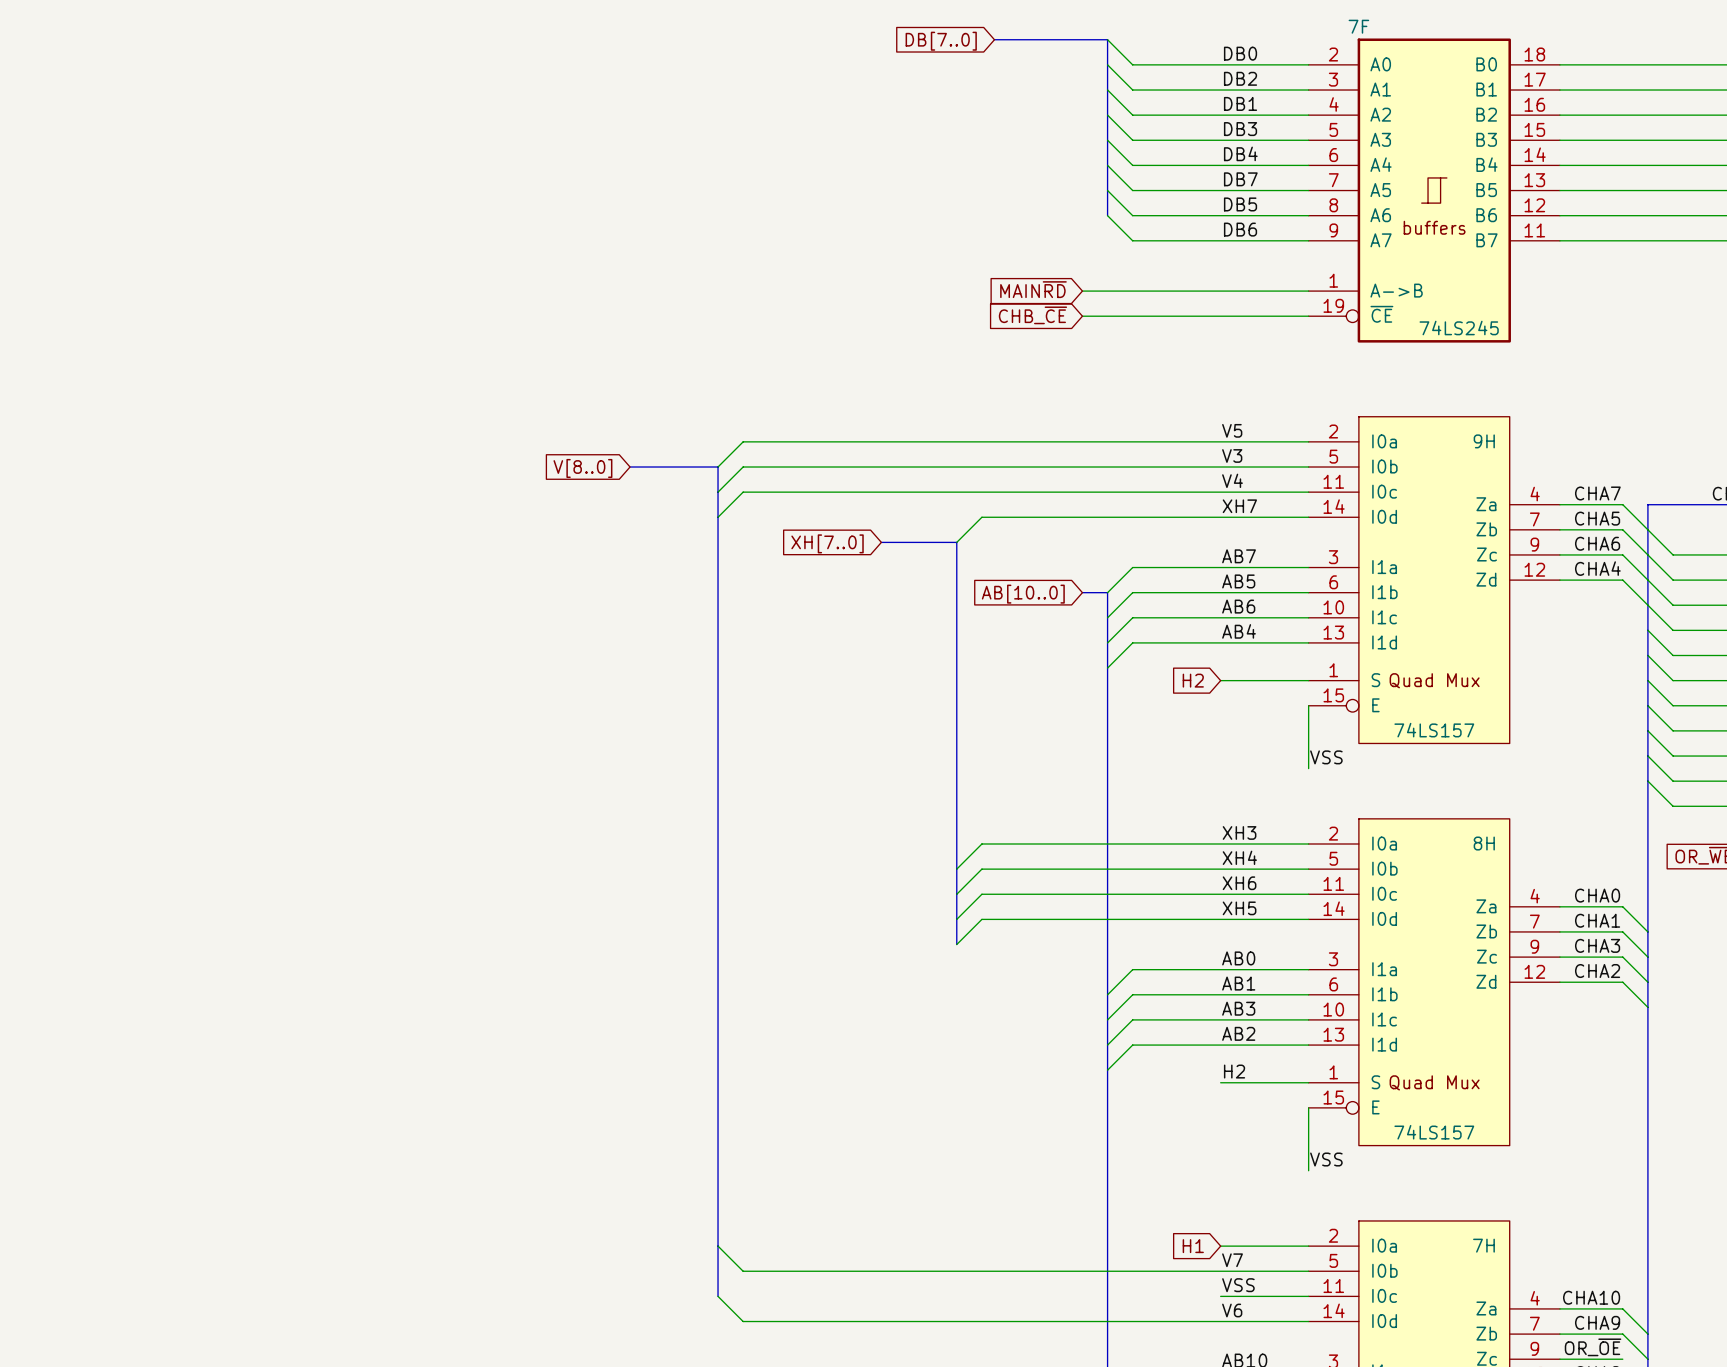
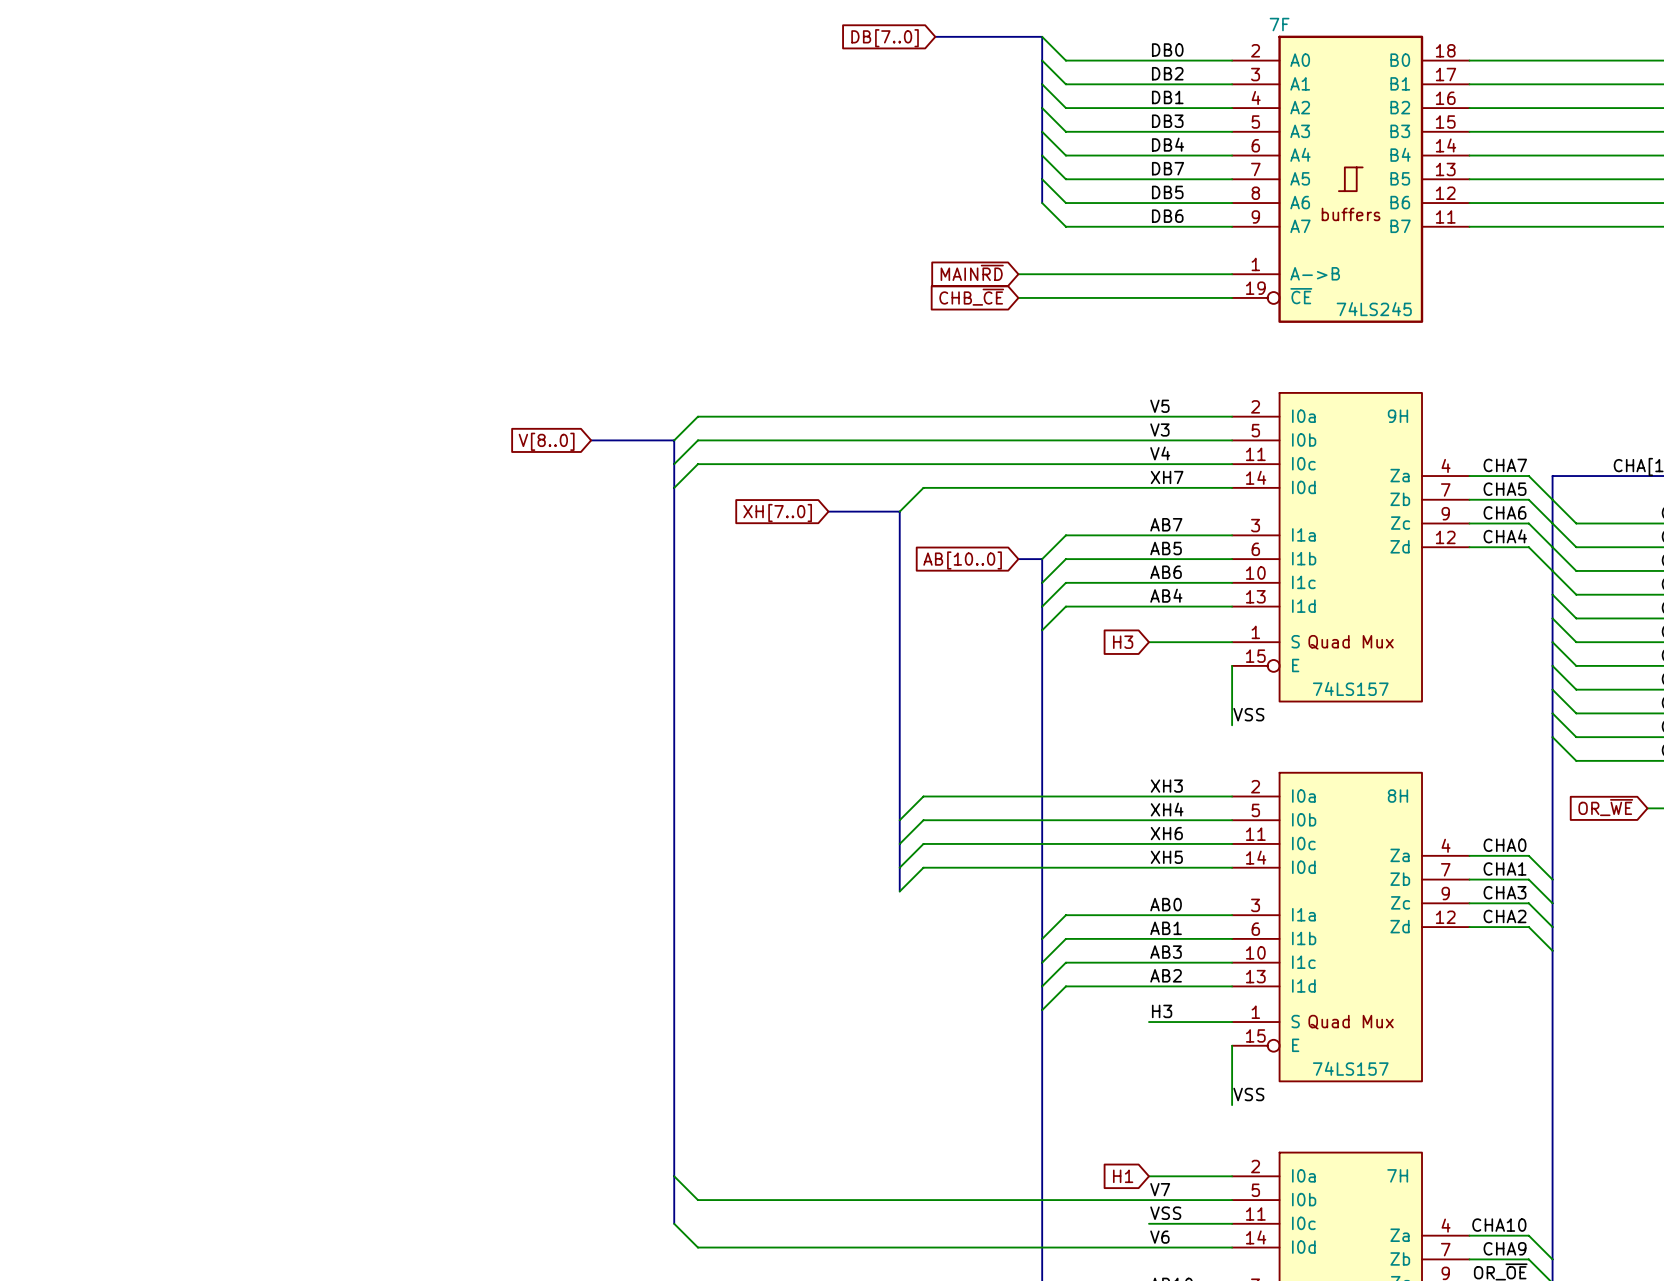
global label: H2 (1193, 680) -> H3 (1123, 642)
label: H2 (1234, 1071) -> H3 (1162, 1011)

